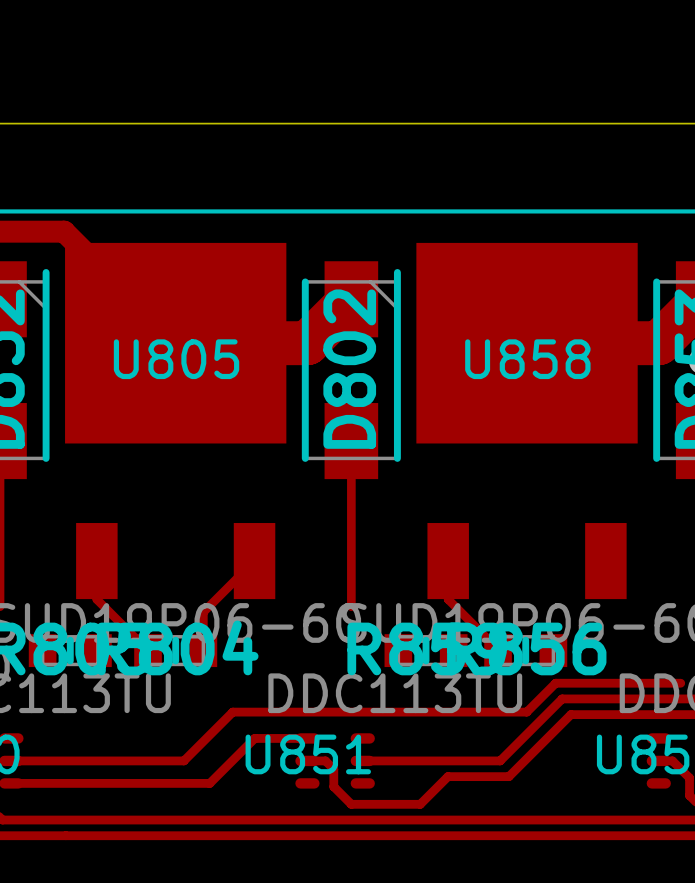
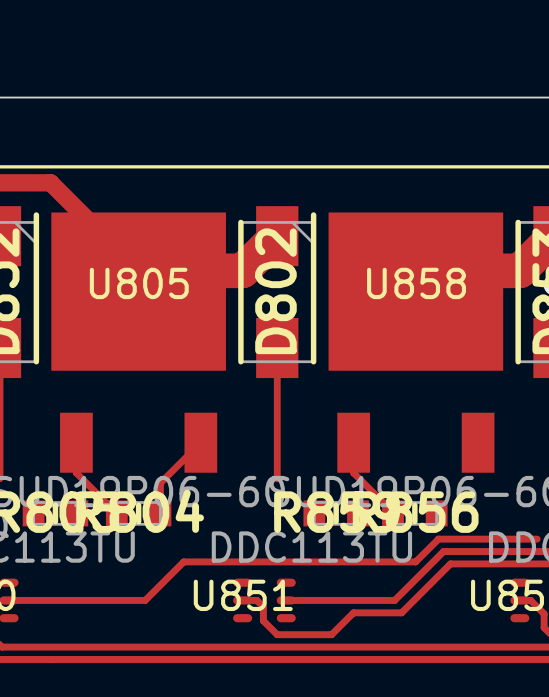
U805 footprint: [65, 242, 287, 600] -> [51, 212, 226, 473]
U858 footprint: [416, 242, 638, 600] -> [328, 212, 504, 473]
track: (307, 738) (254, 738) (209, 783) (11, 783) -> none

